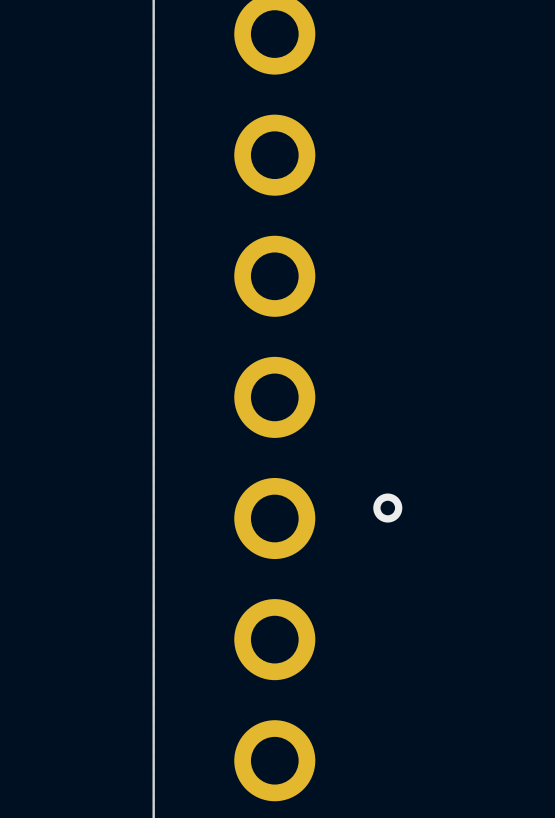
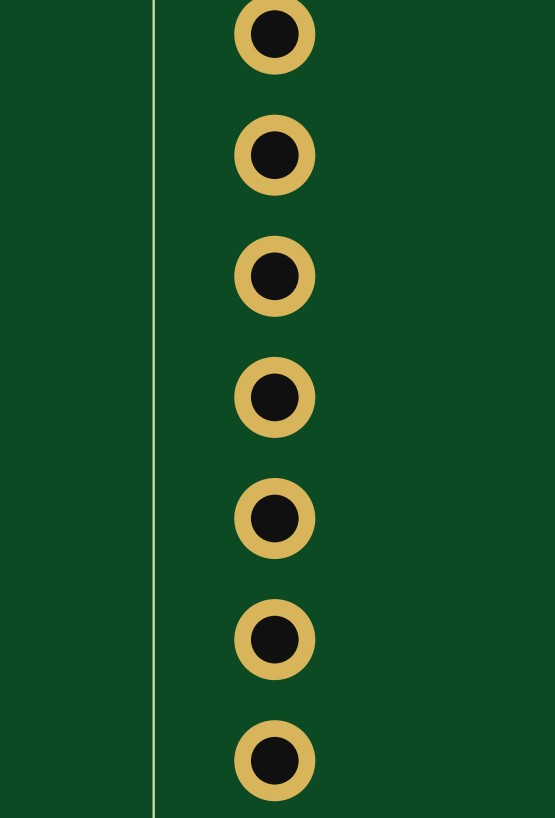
via: (387, 508) -> none

